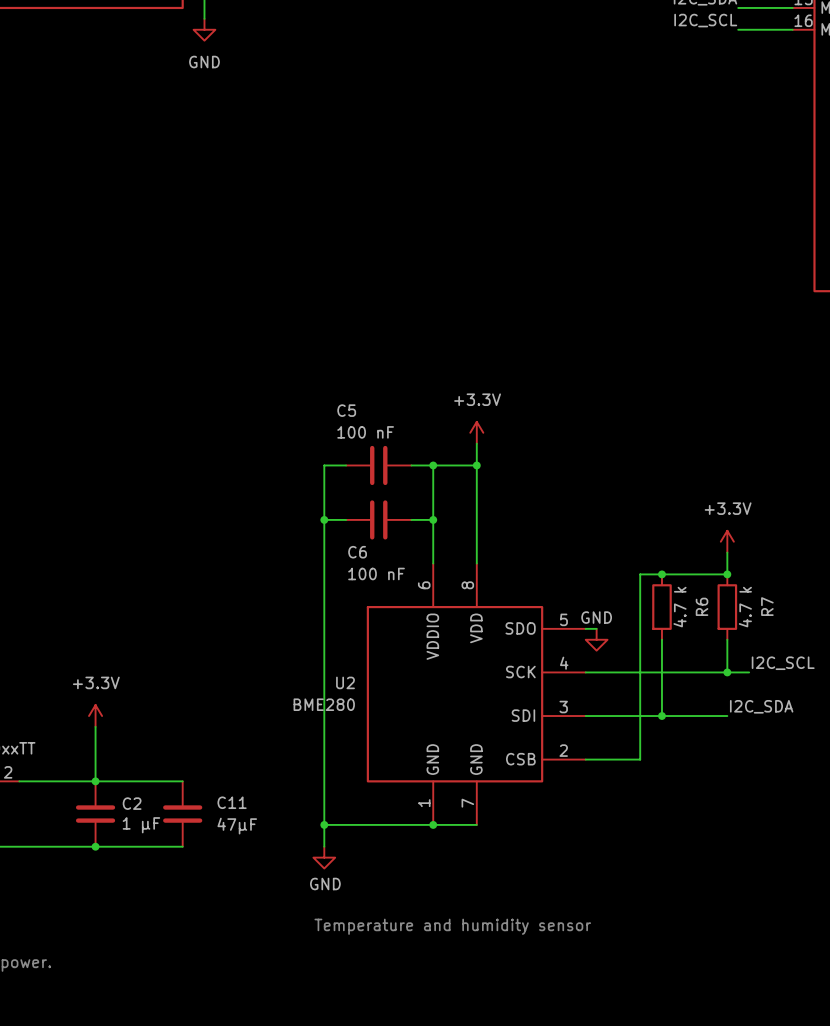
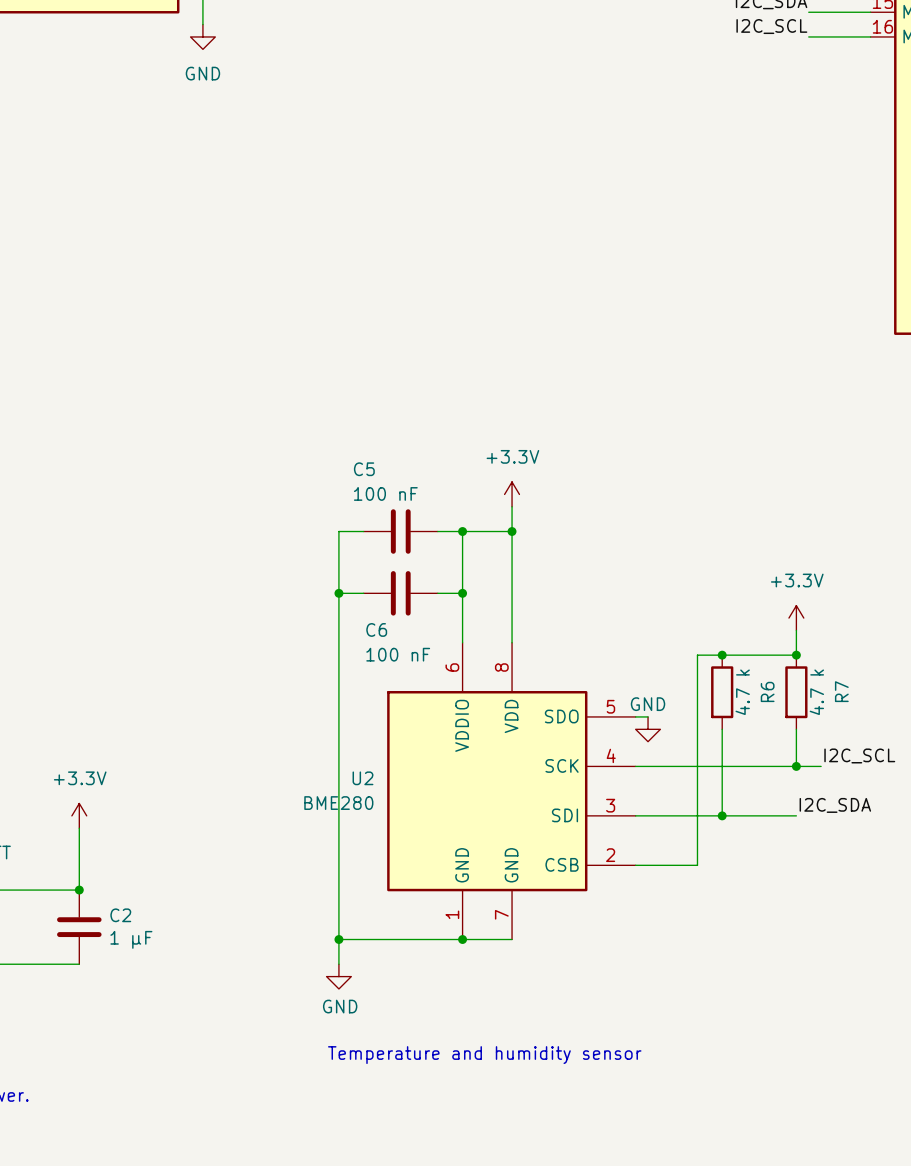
wire: (95, 781) (182, 781) -> none
C11: 47µF (182, 814) -> none
wire: (95, 846) (182, 846) -> none
junction: (95, 846) -> none

